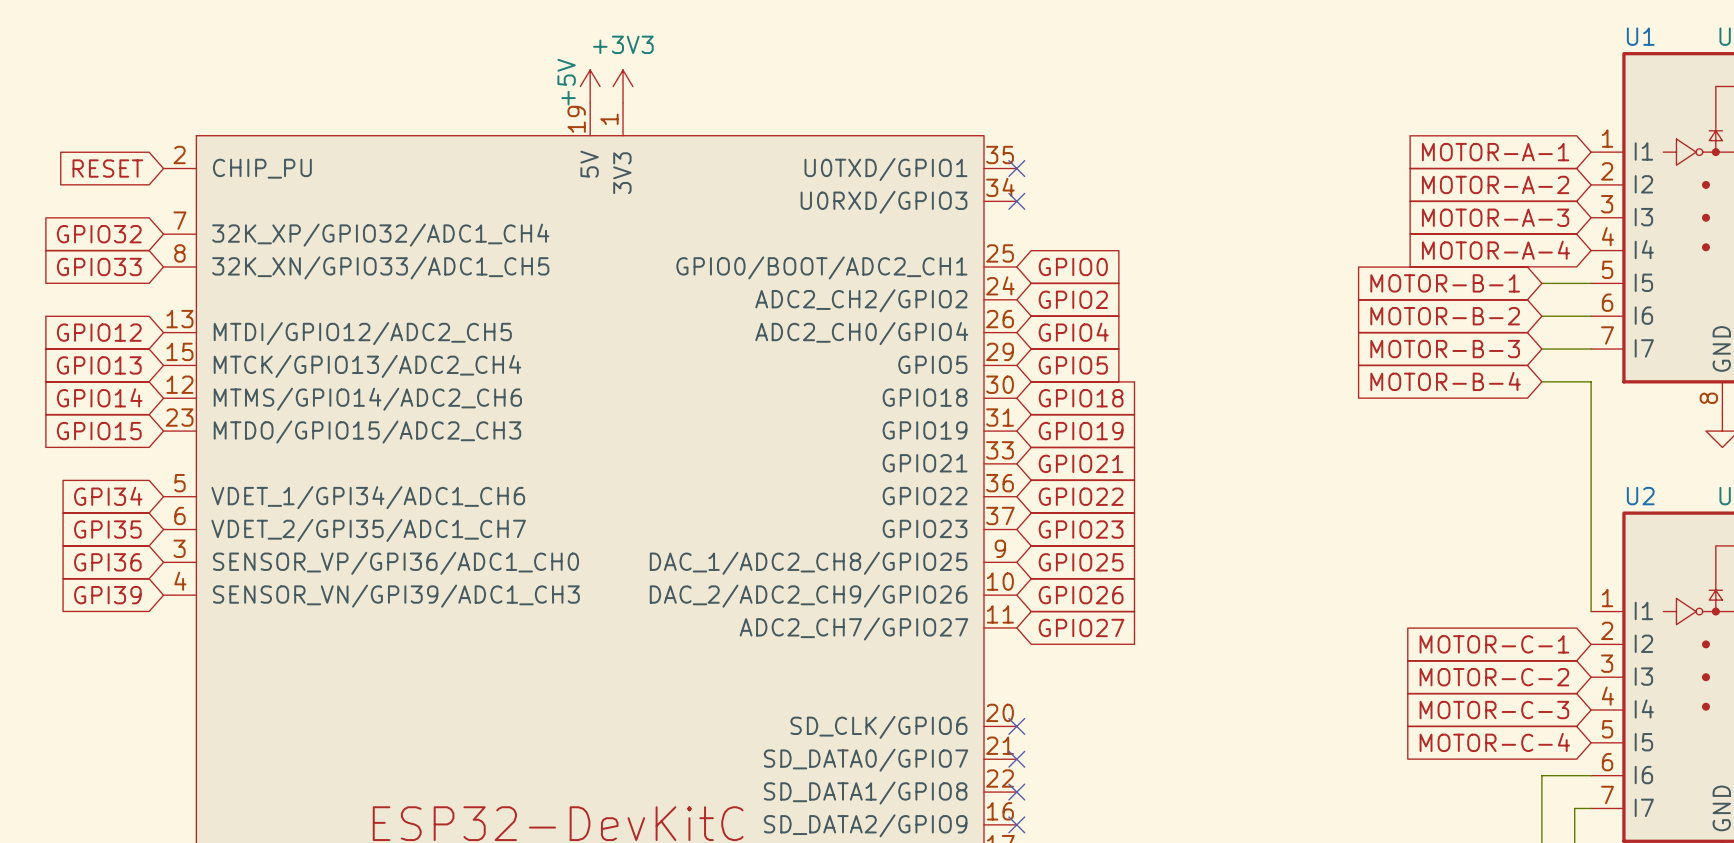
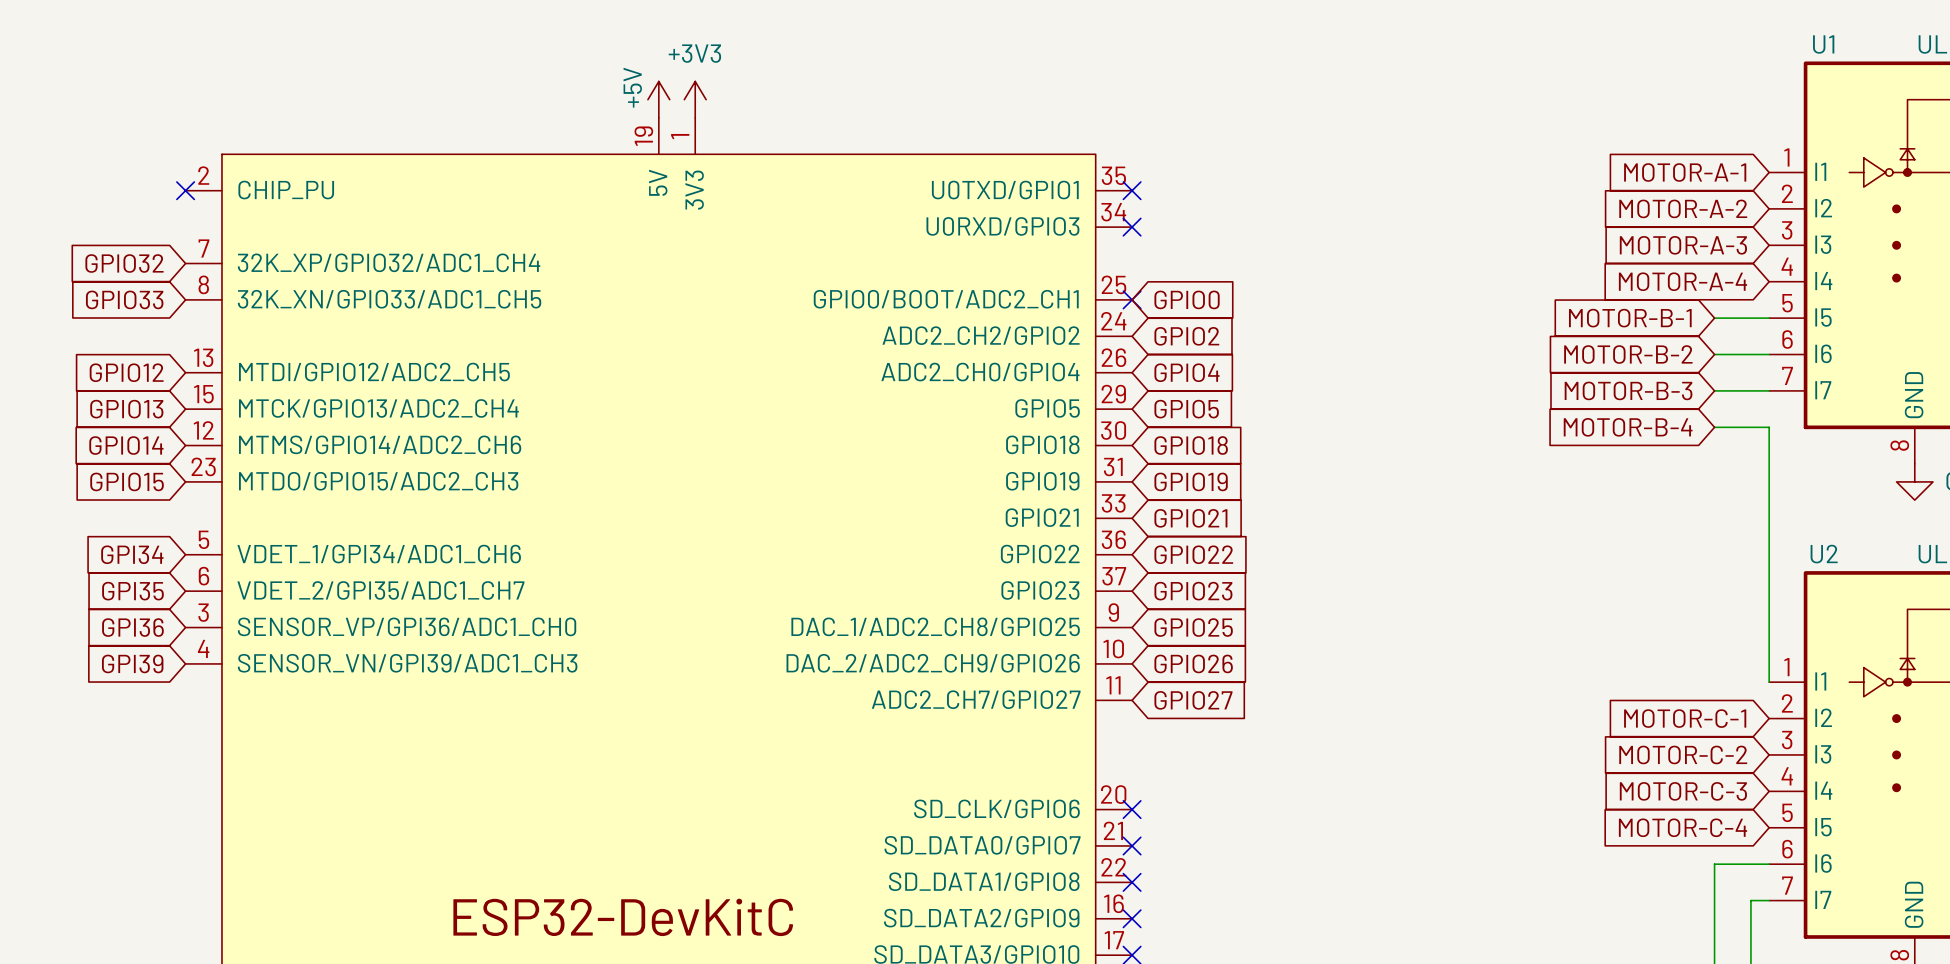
global label: RESET (107, 168) -> none
no-connect mark: none -> (185, 190)
no-connect mark: none -> (1132, 299)

